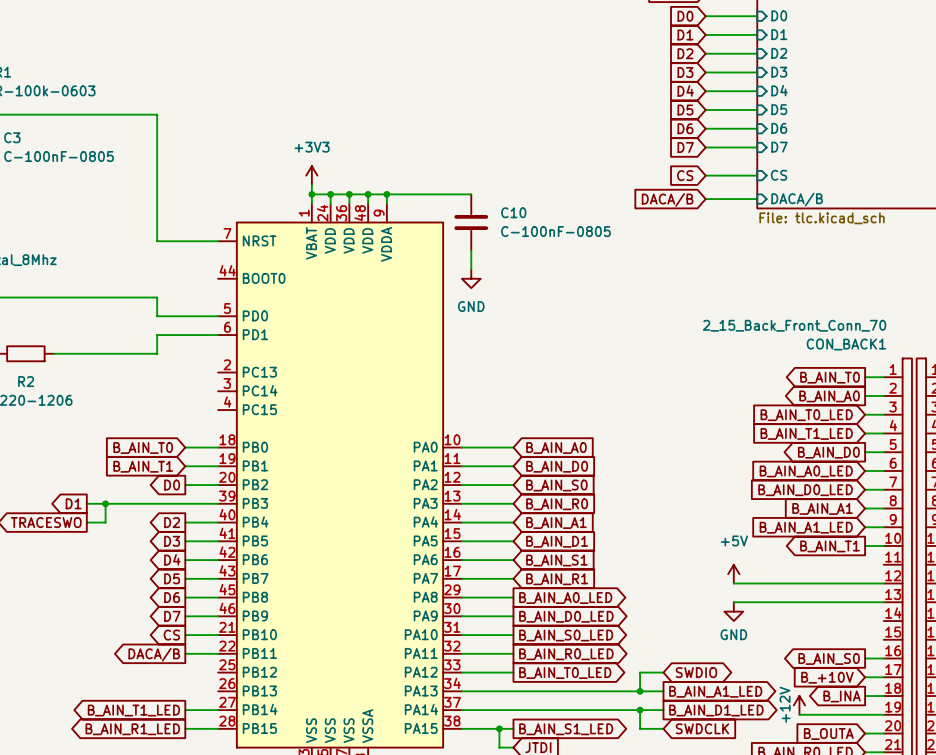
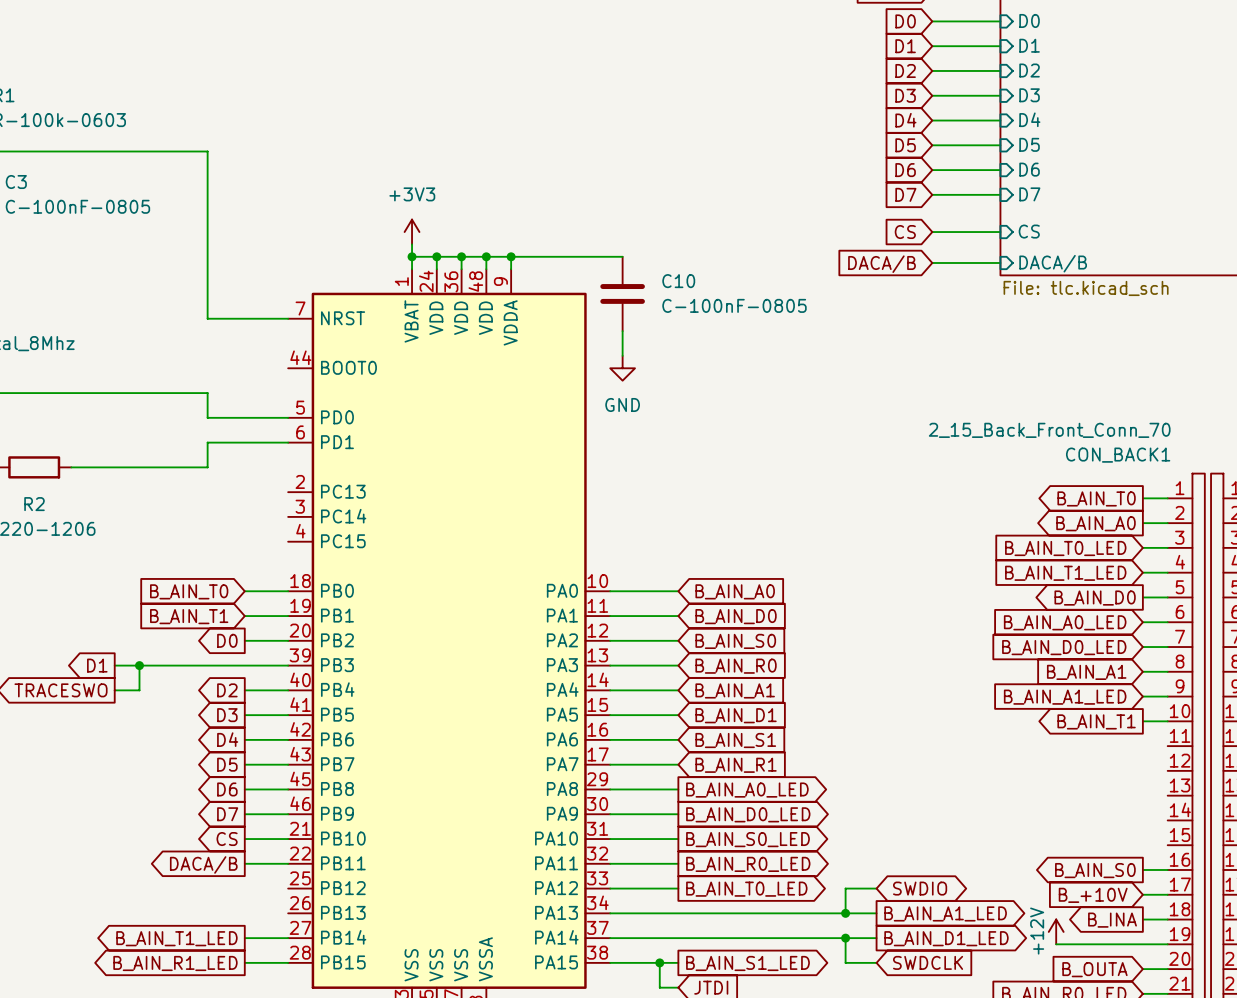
power symbol: +5V (733, 574) -> none
wire: (733, 583) (883, 583) -> none
wire: (733, 602) (883, 602) -> none
power symbol: GND (733, 611) -> none

